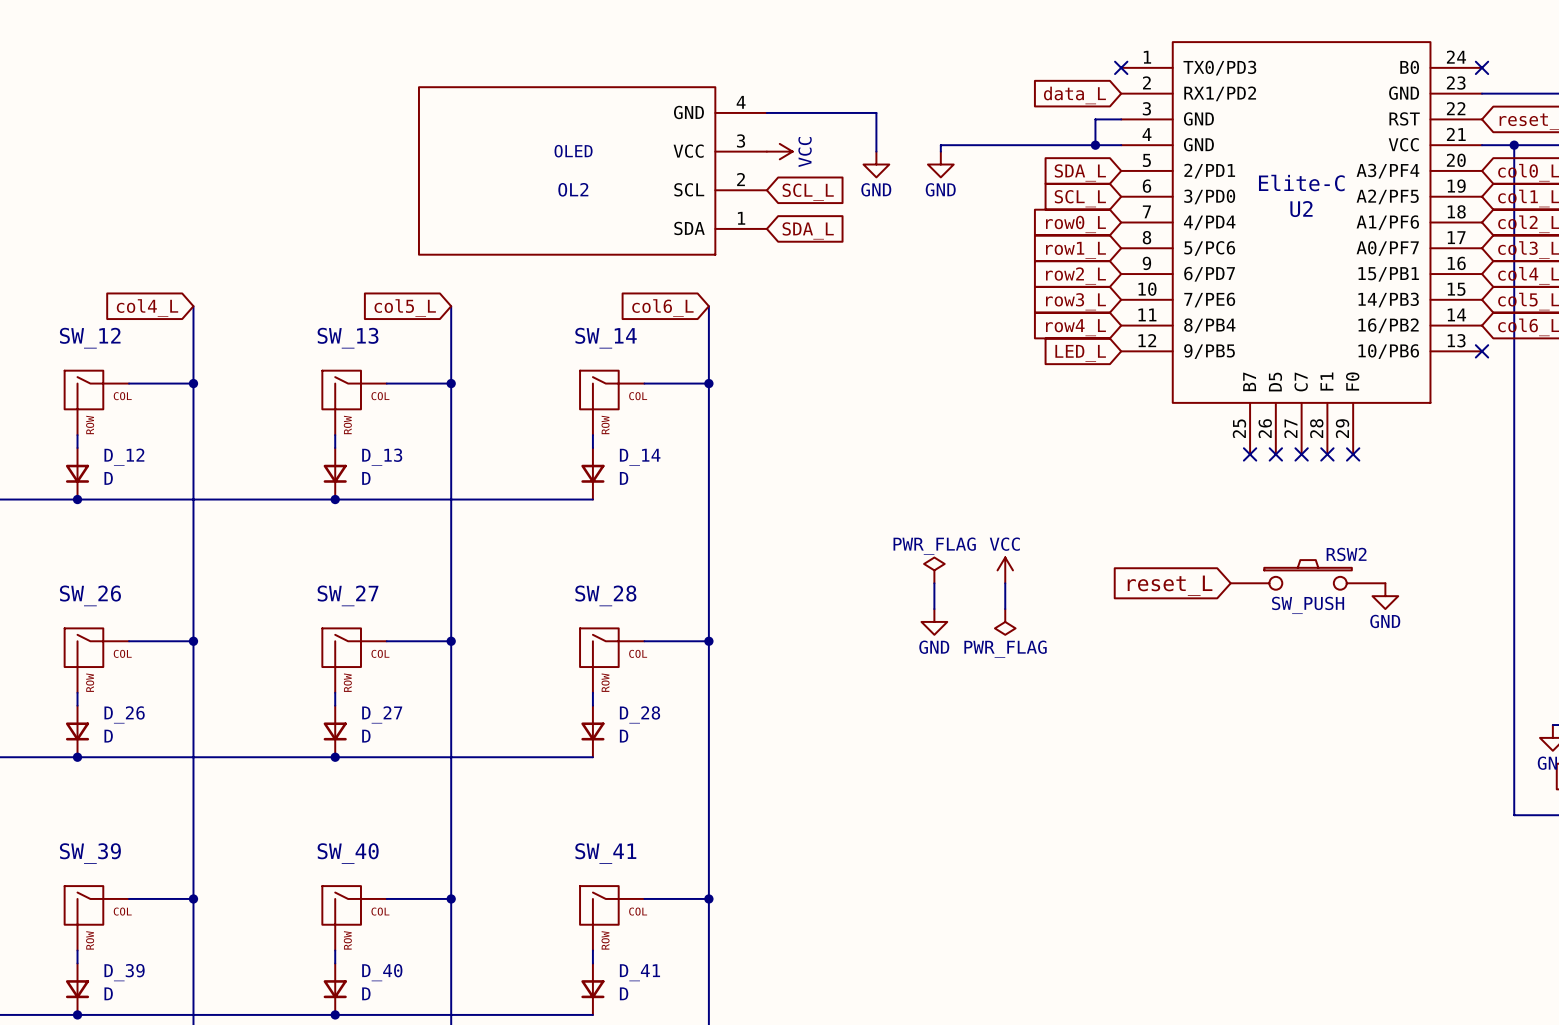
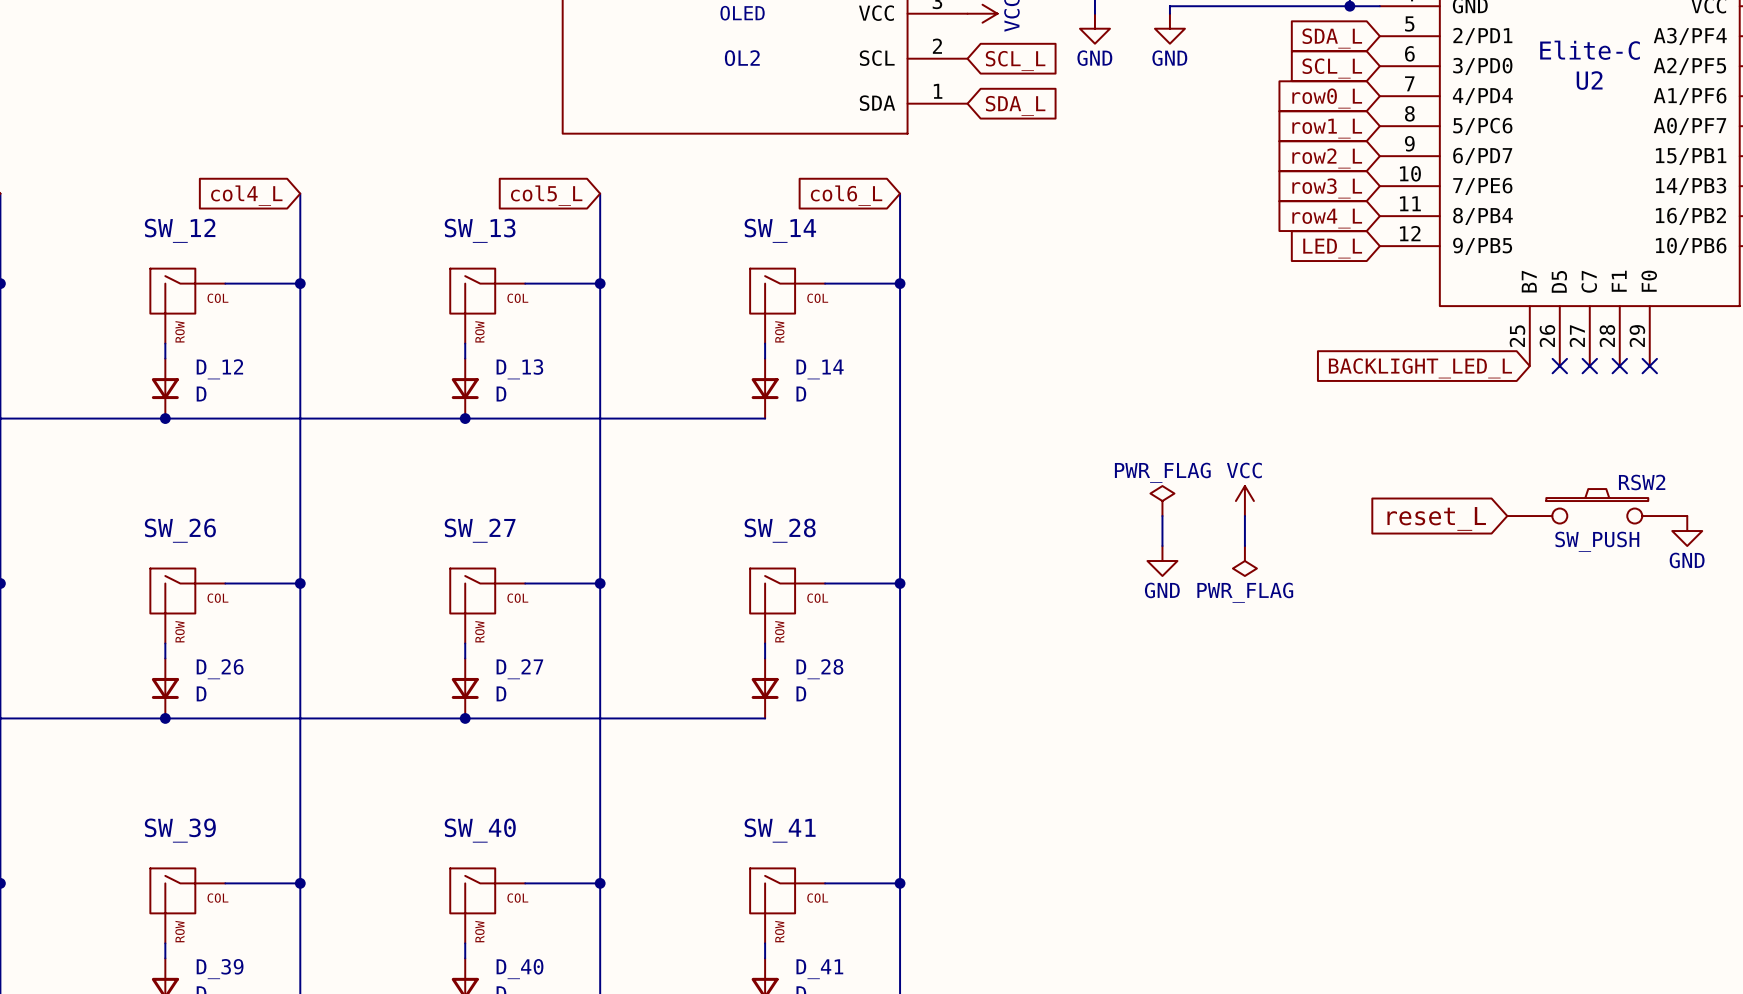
no-connect mark: (1250, 454) -> none
global label: none -> BACKLIGHT_LED_L (1420, 368)

